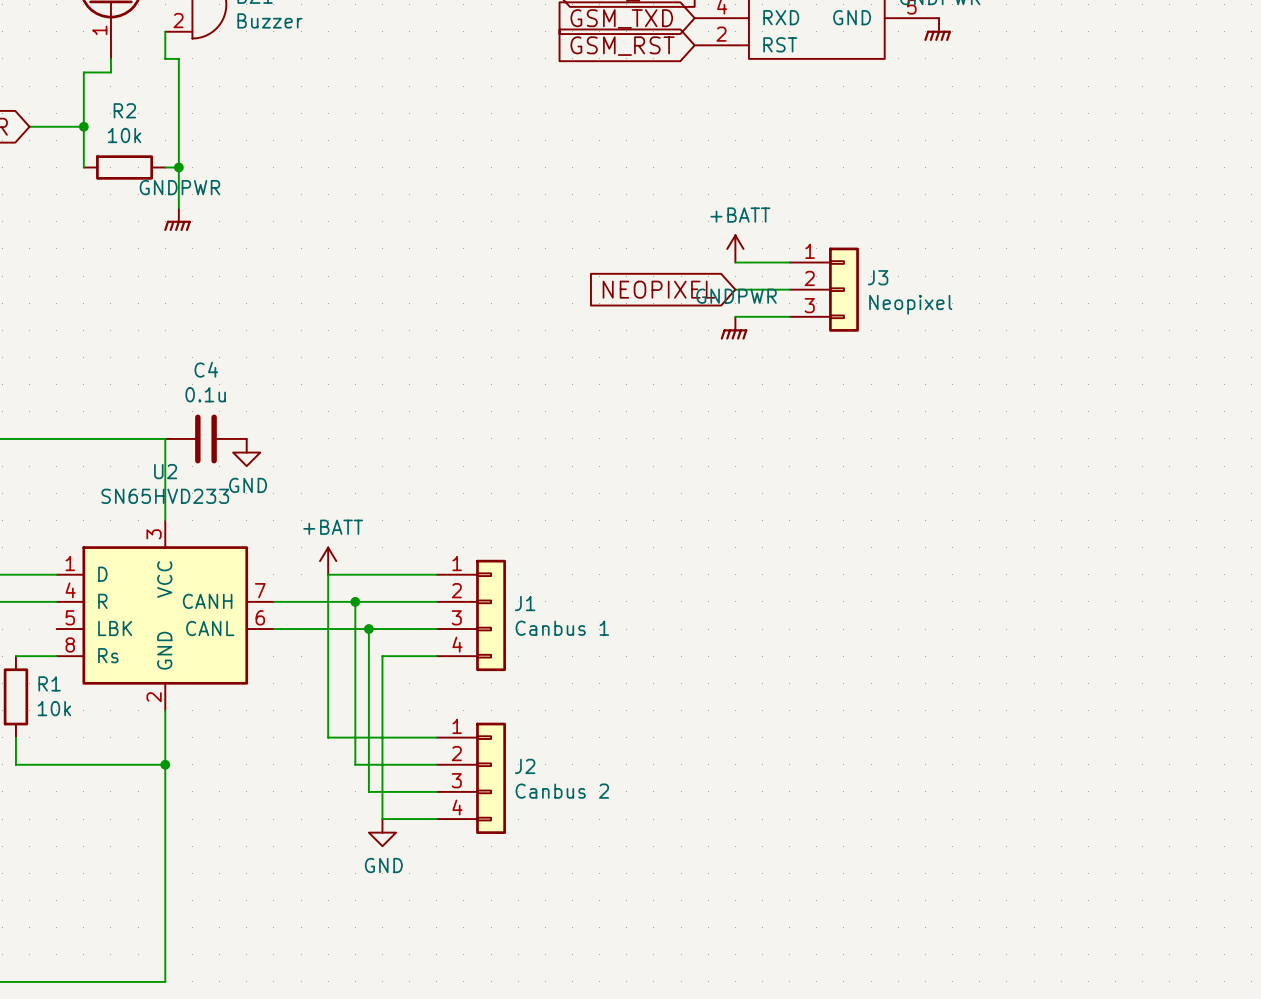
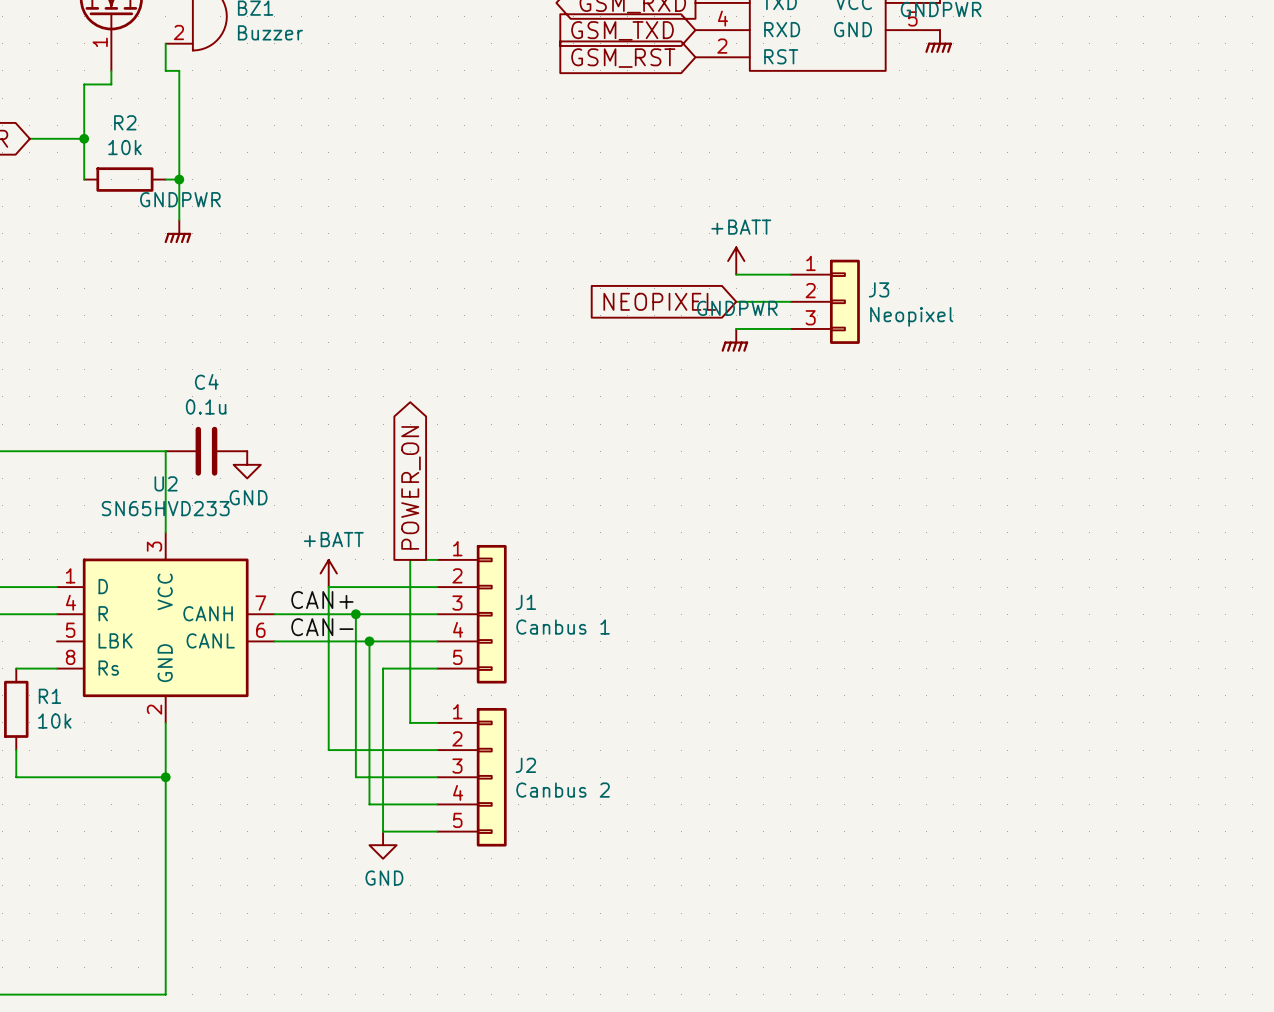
global label: none -> POWER_ON (411, 487)
wire: none -> (437, 559) (410, 559) (410, 722) (437, 722)
J1 symbol: [436, 559, 506, 672] -> [437, 544, 507, 684]
label: none -> CAN+ (322, 600)
label: none -> CAN- (322, 627)
J2 symbol: [436, 722, 506, 834] -> [437, 707, 507, 847]

